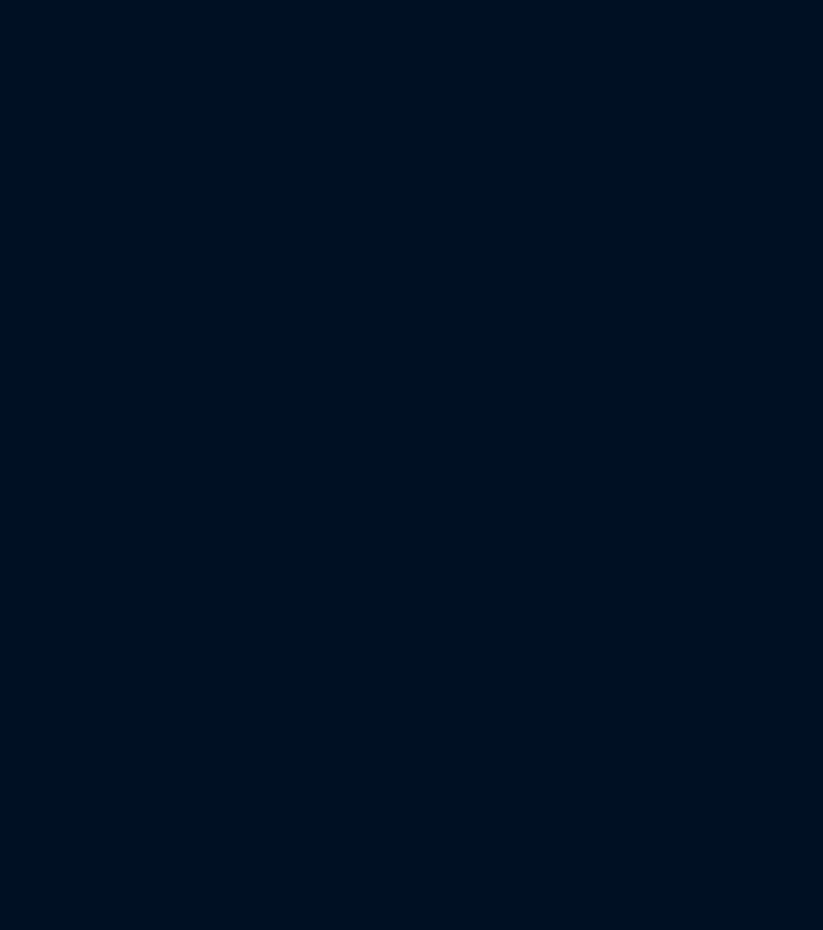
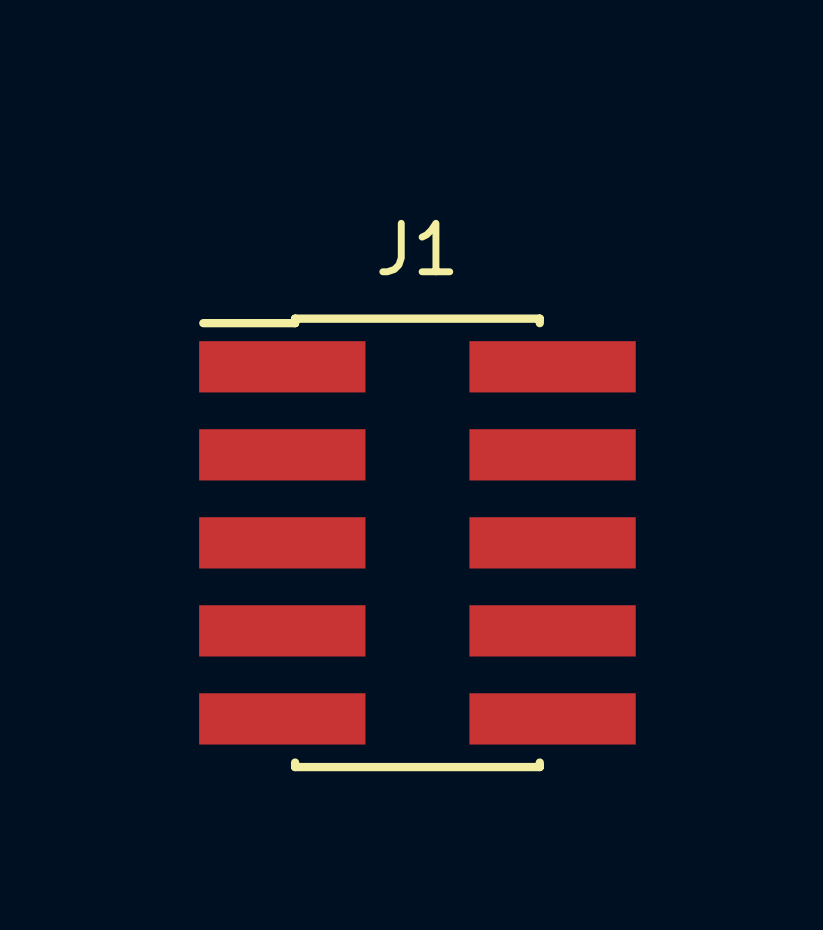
J1: none -> (417, 542)

